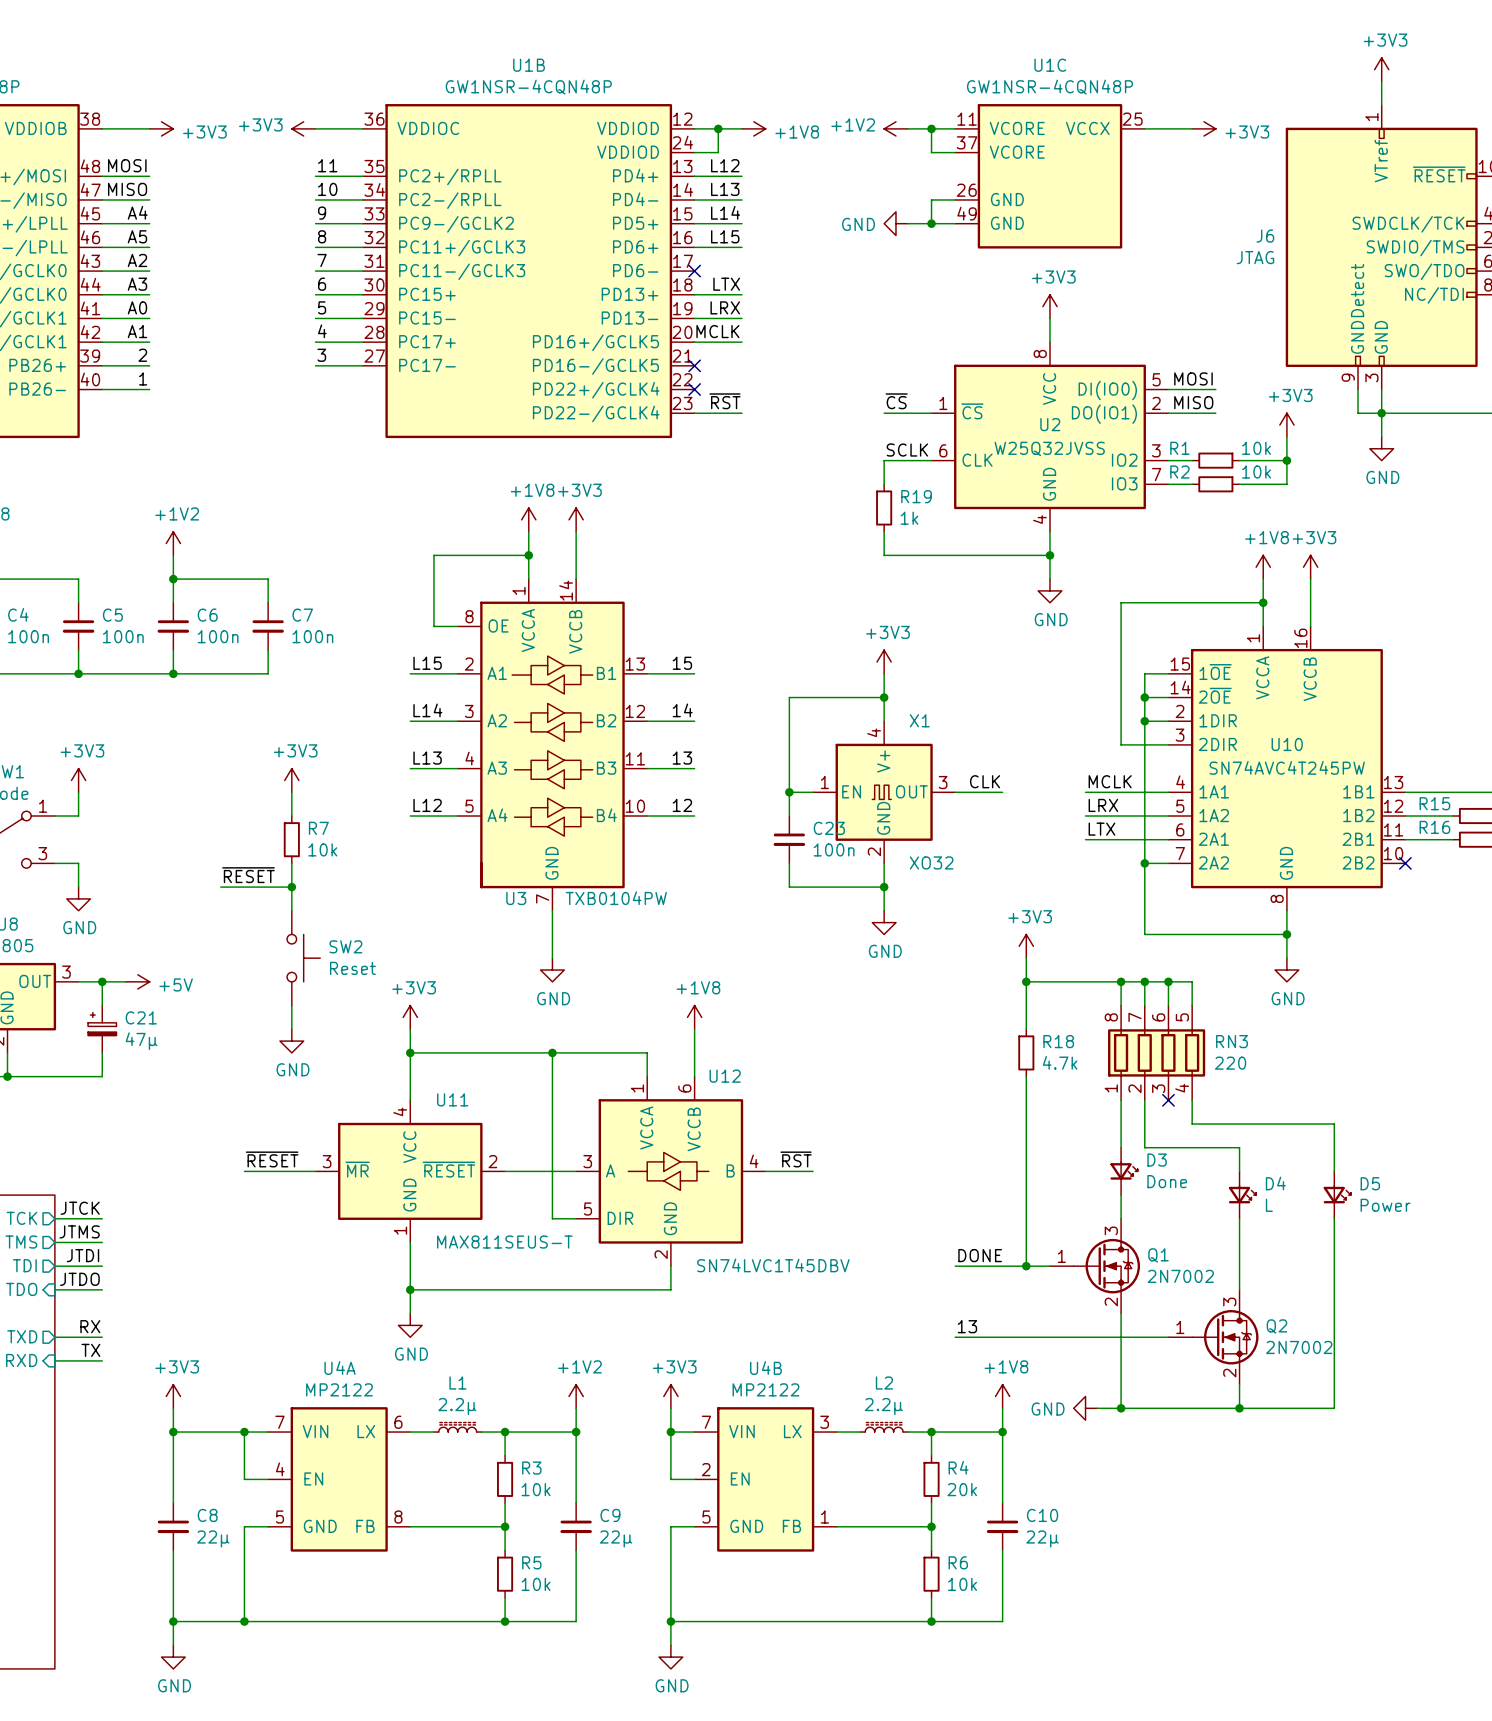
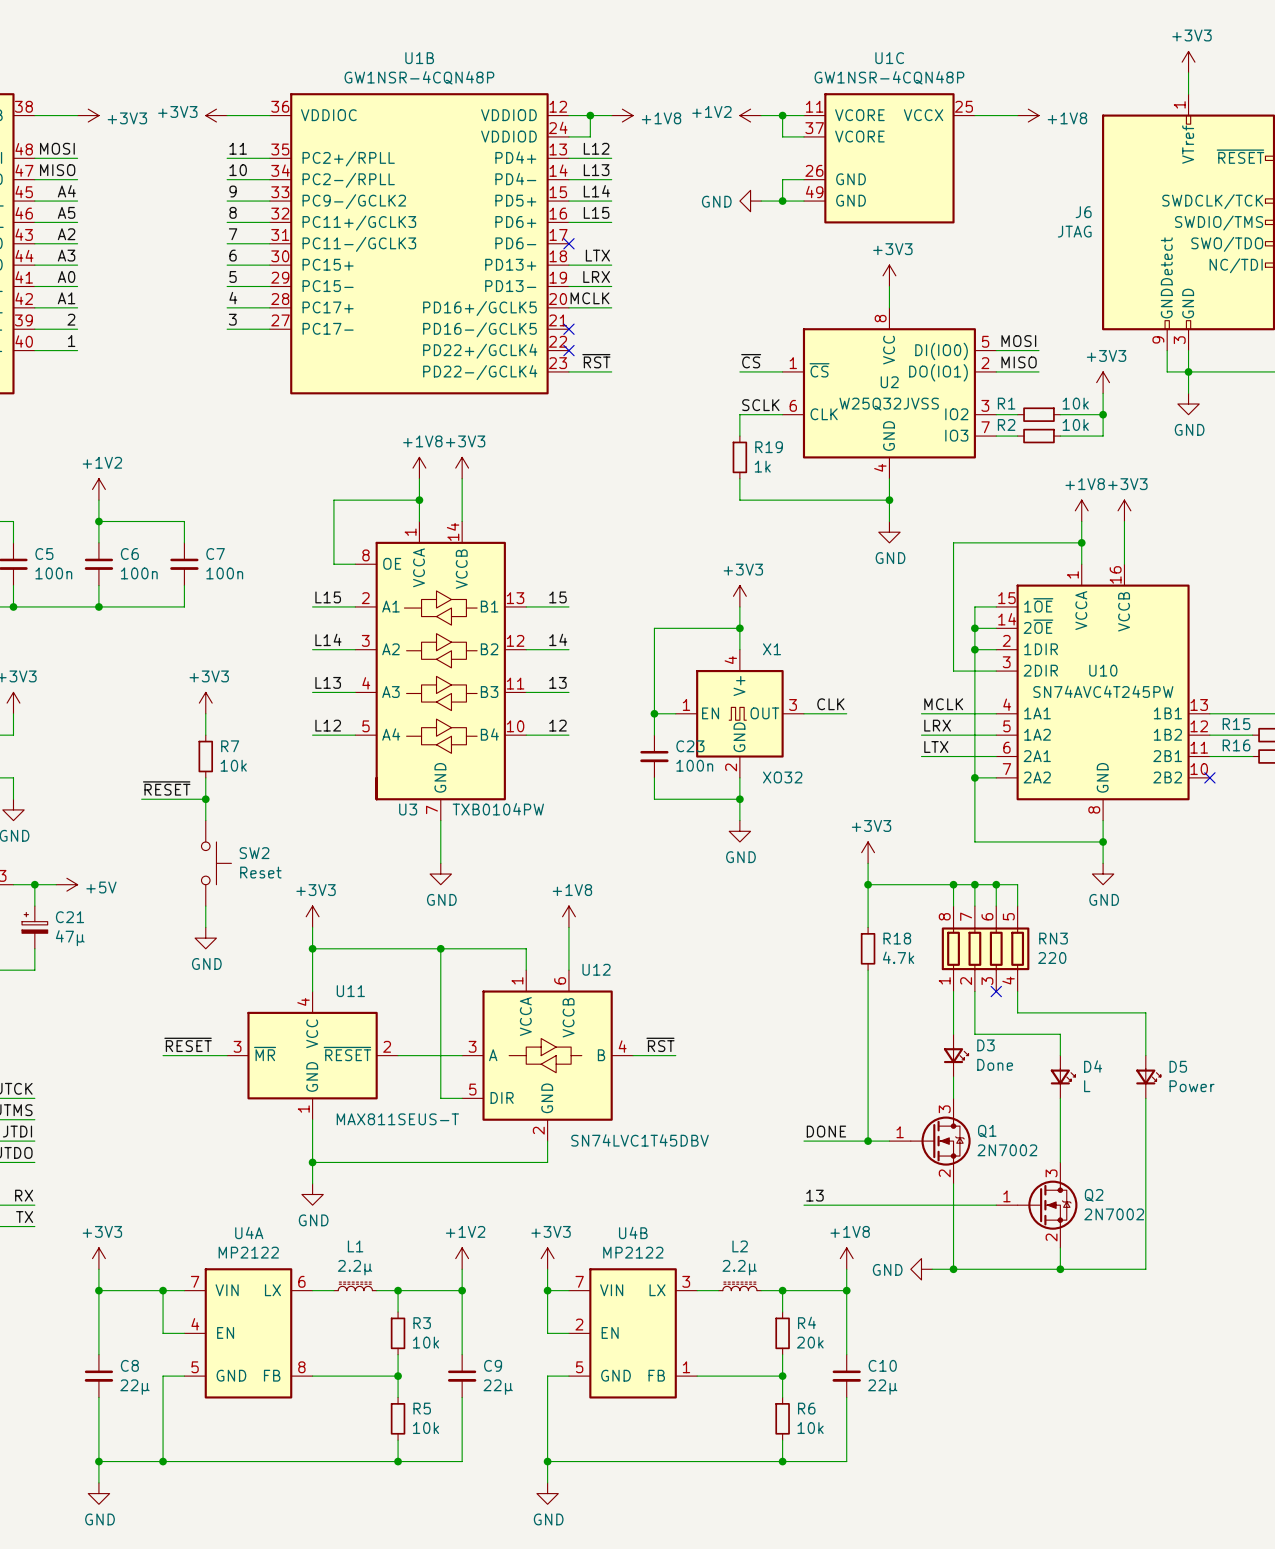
power symbol: +3V3 (1204, 128) -> +1V8 (1028, 115)

